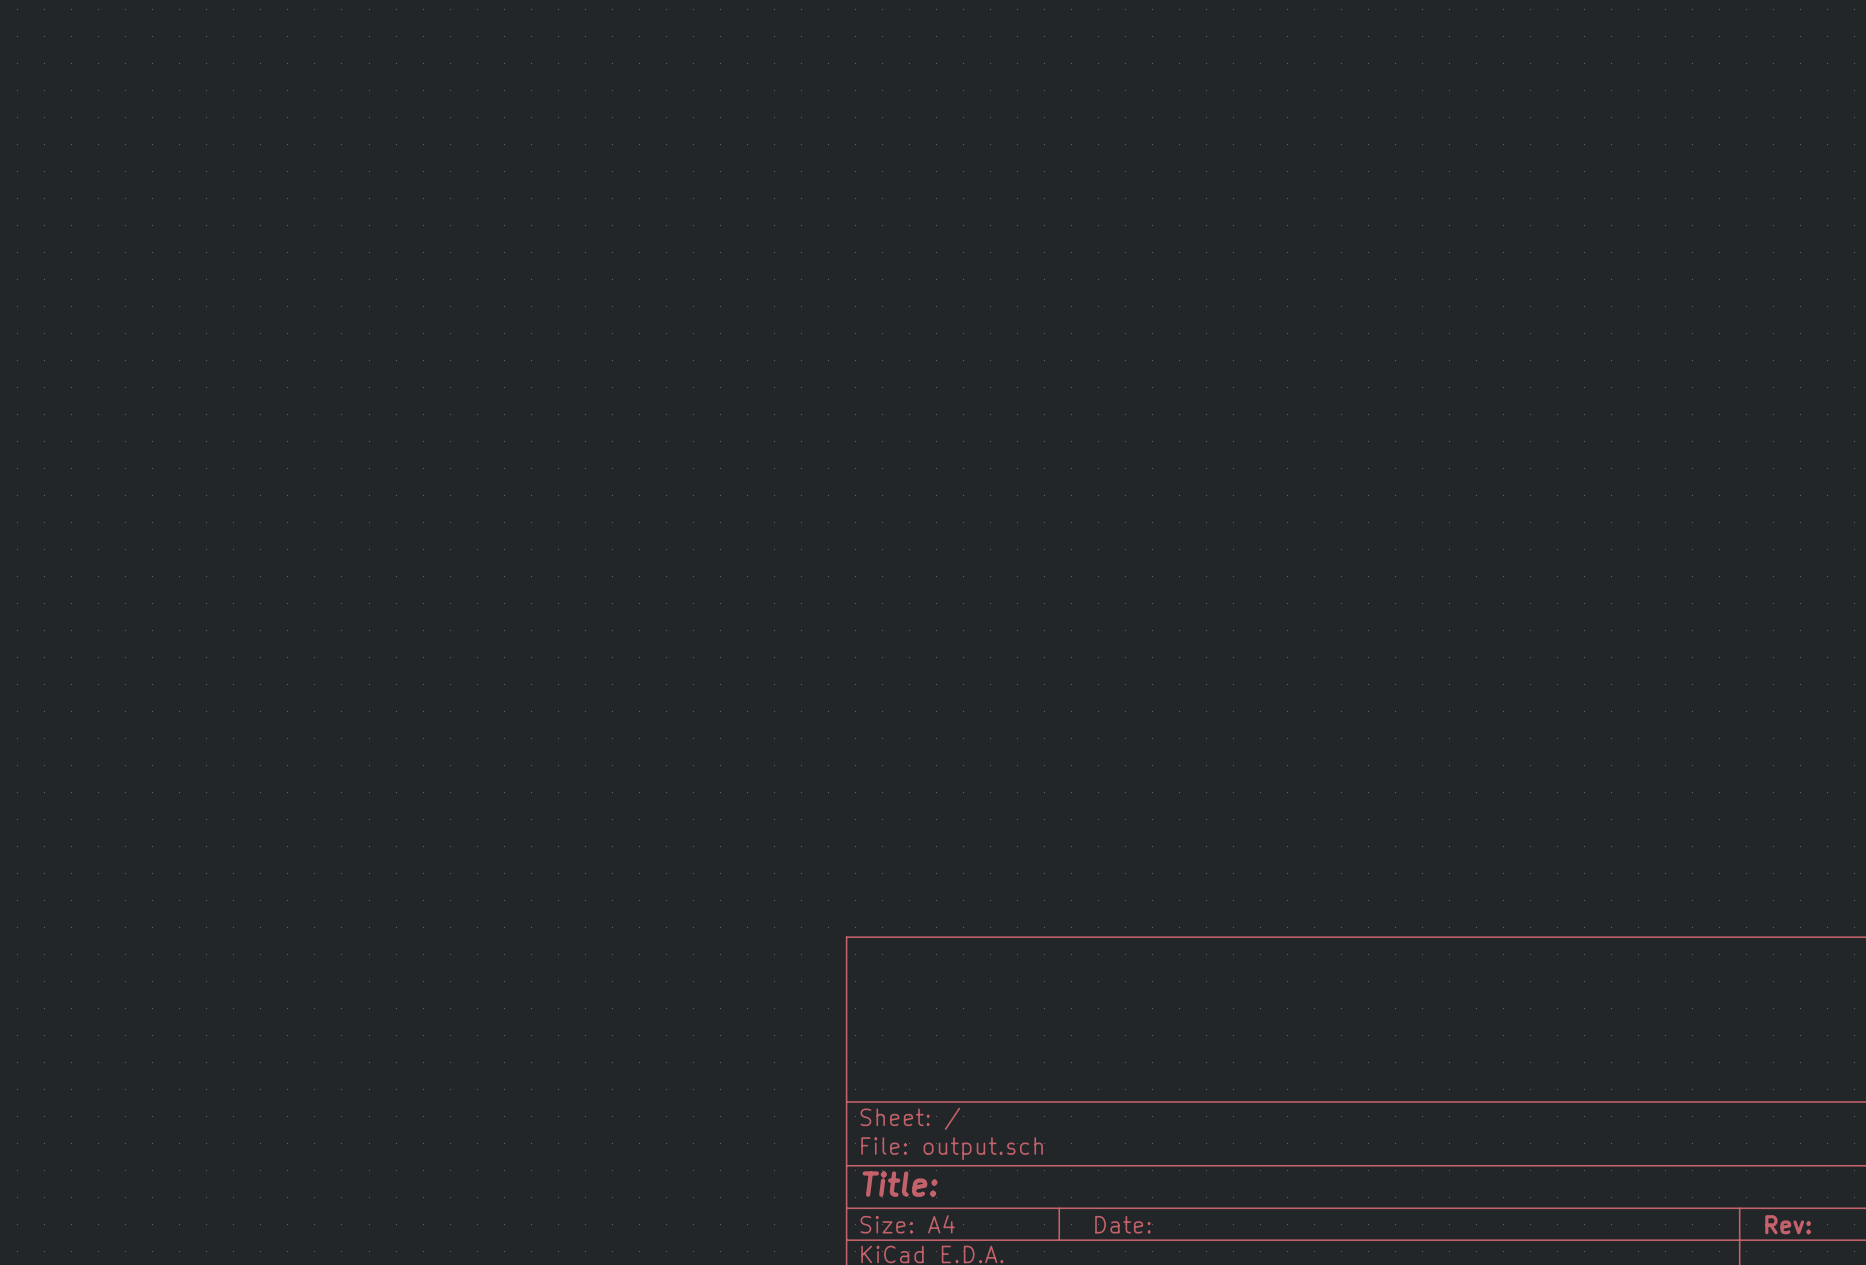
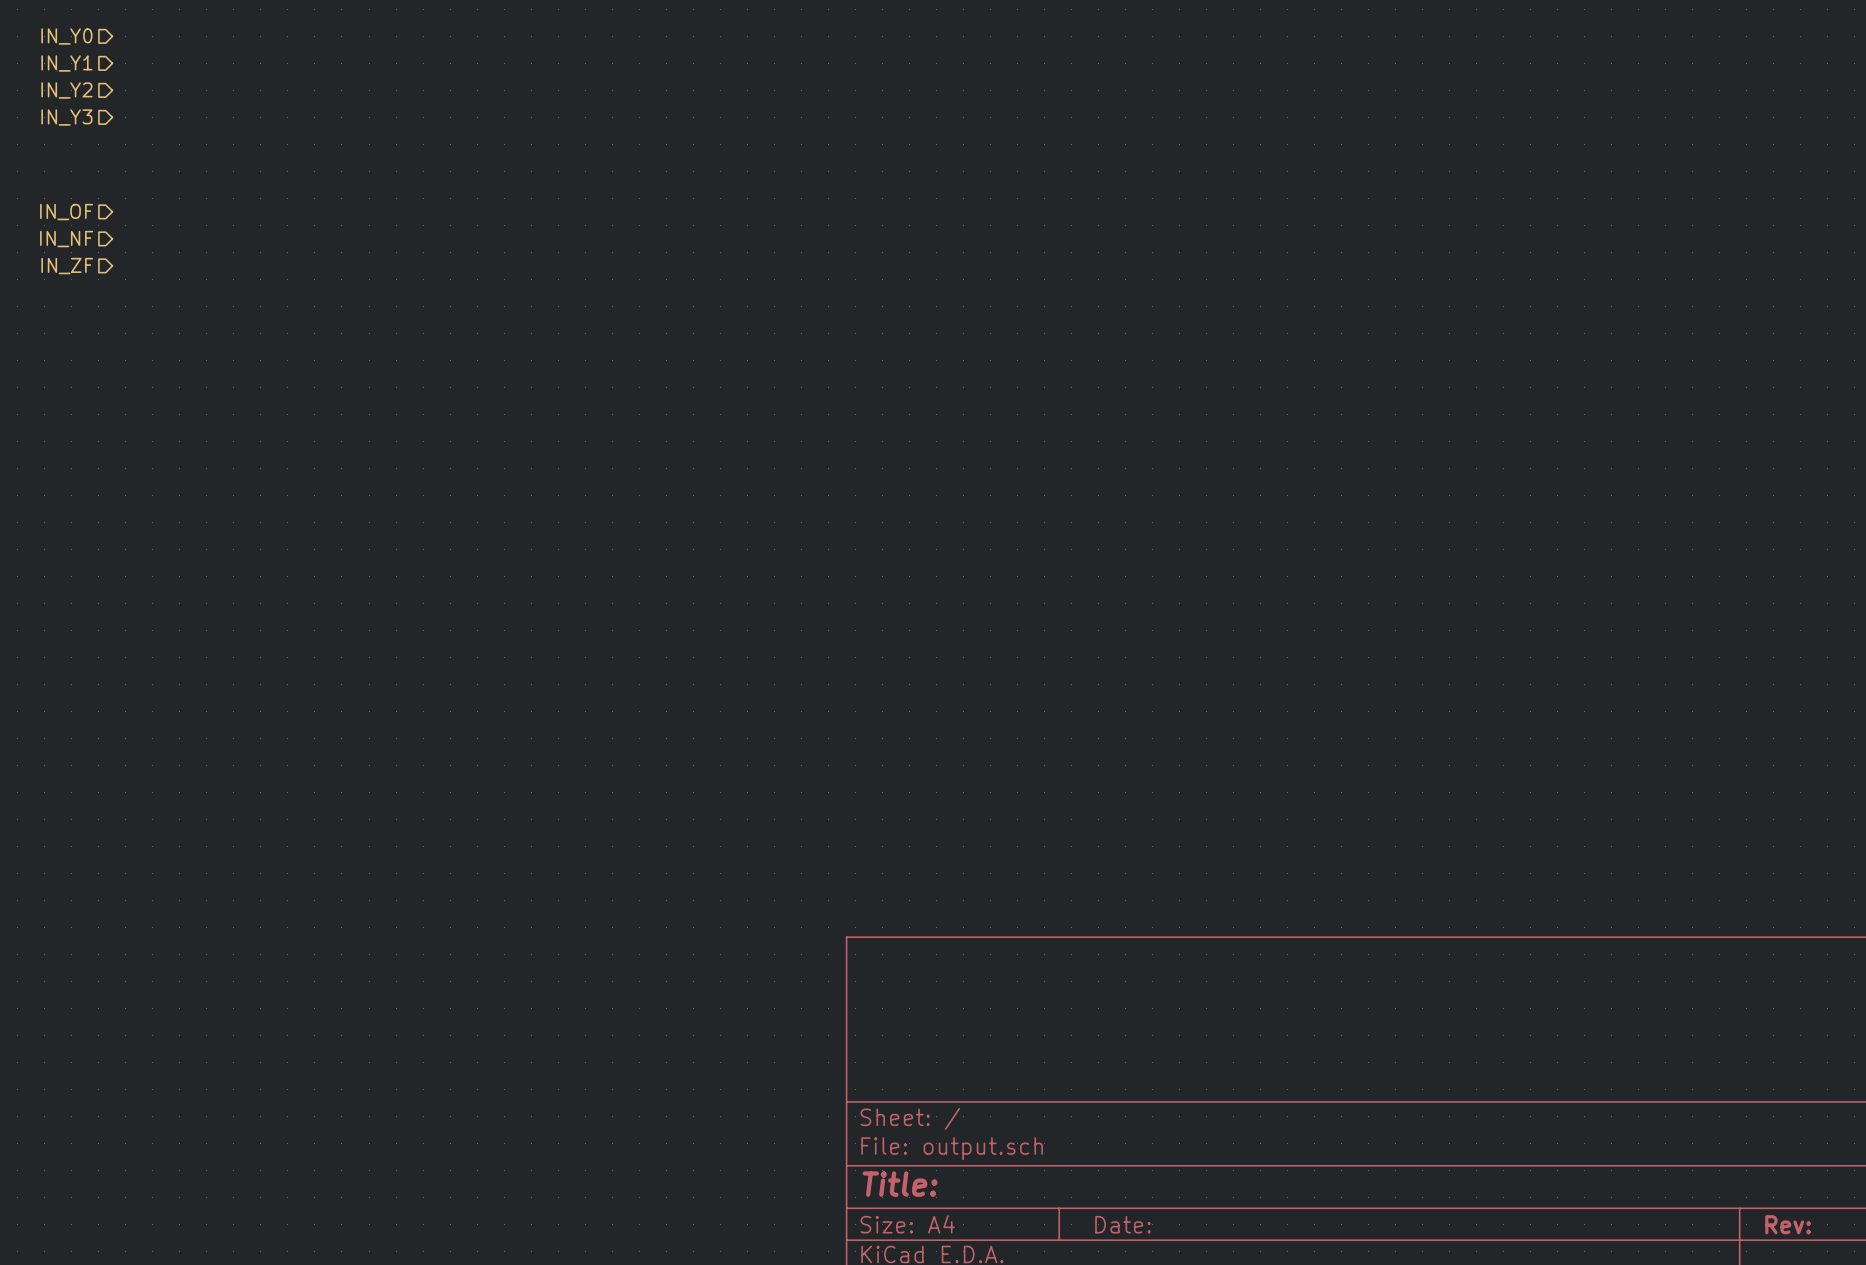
hierarchical label: none -> IN_Y0 (66, 36)
hierarchical label: none -> IN_Y1 (66, 63)
hierarchical label: none -> IN_Y2 (66, 90)
hierarchical label: none -> IN_Y3 (66, 117)
hierarchical label: none -> IN_OF (66, 212)
hierarchical label: none -> IN_NF (66, 239)
hierarchical label: none -> IN_ZF (67, 266)

